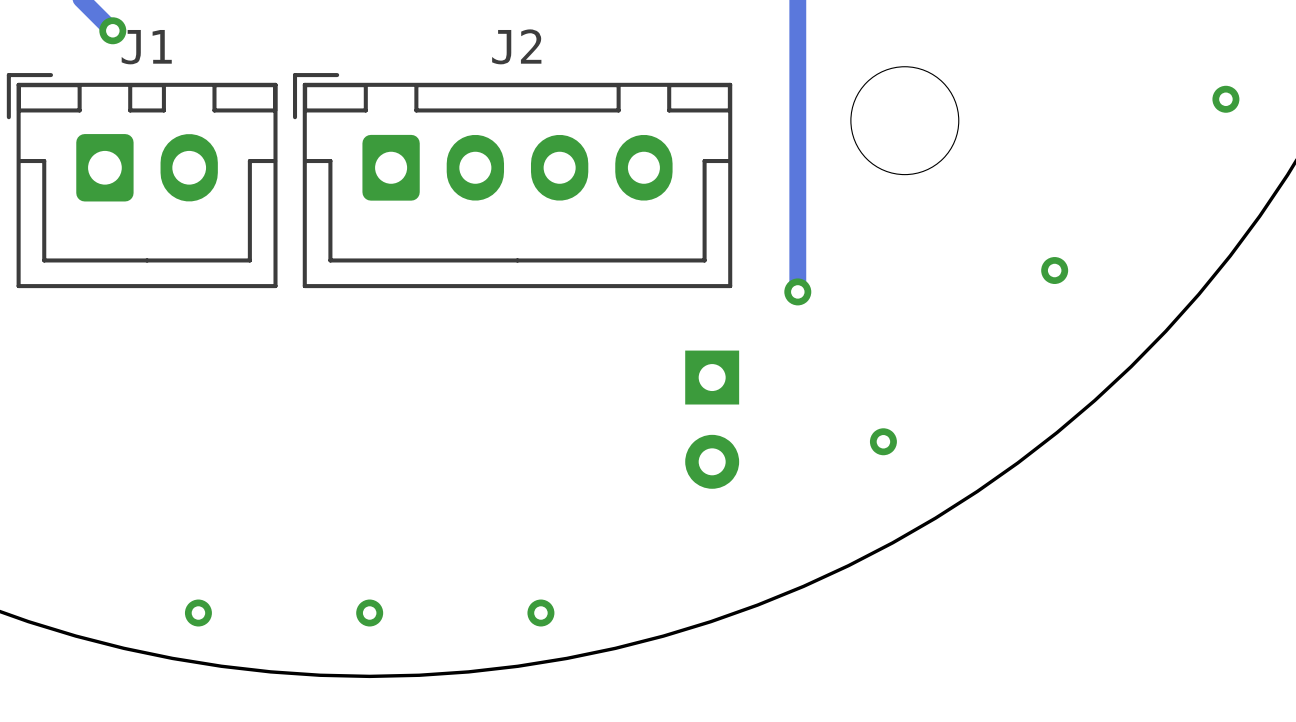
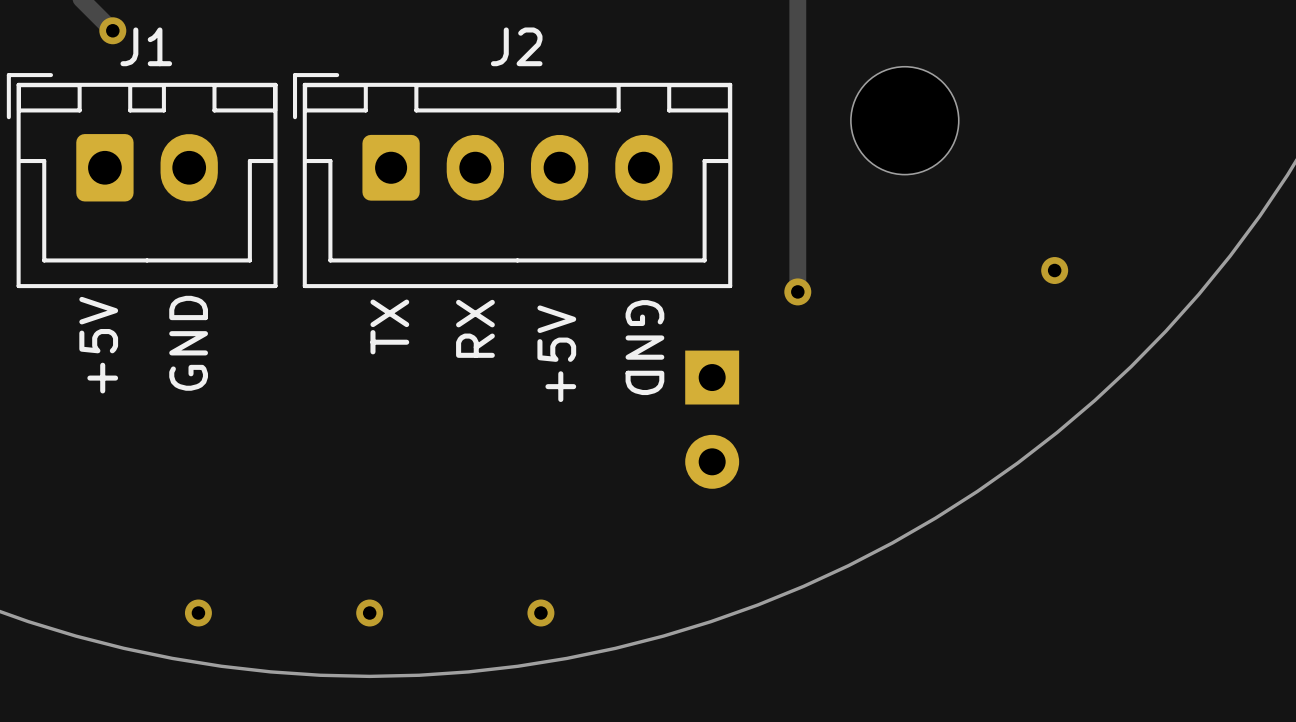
via: (1225, 99) -> none
text: none -> TX (389, 326)
text: none -> RX (475, 328)
text: none -> GND (188, 343)
text: none -> +5V (98, 345)
text: none -> GND (644, 347)
text: none -> +5V (556, 353)
via: (883, 441) -> none

